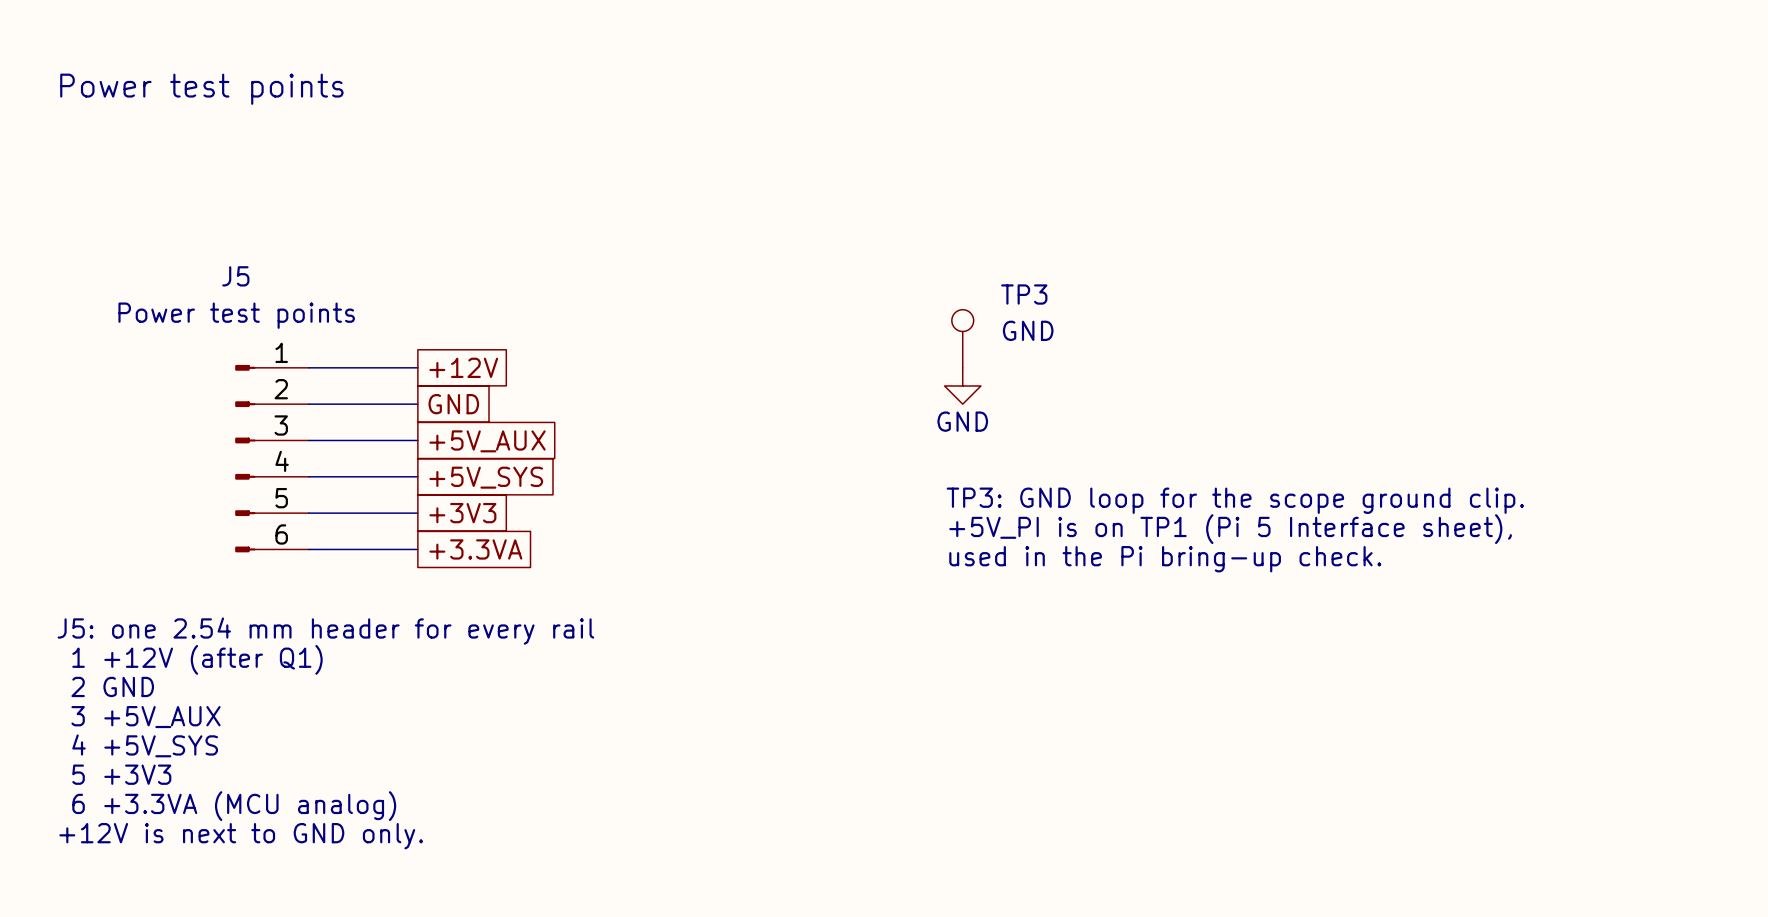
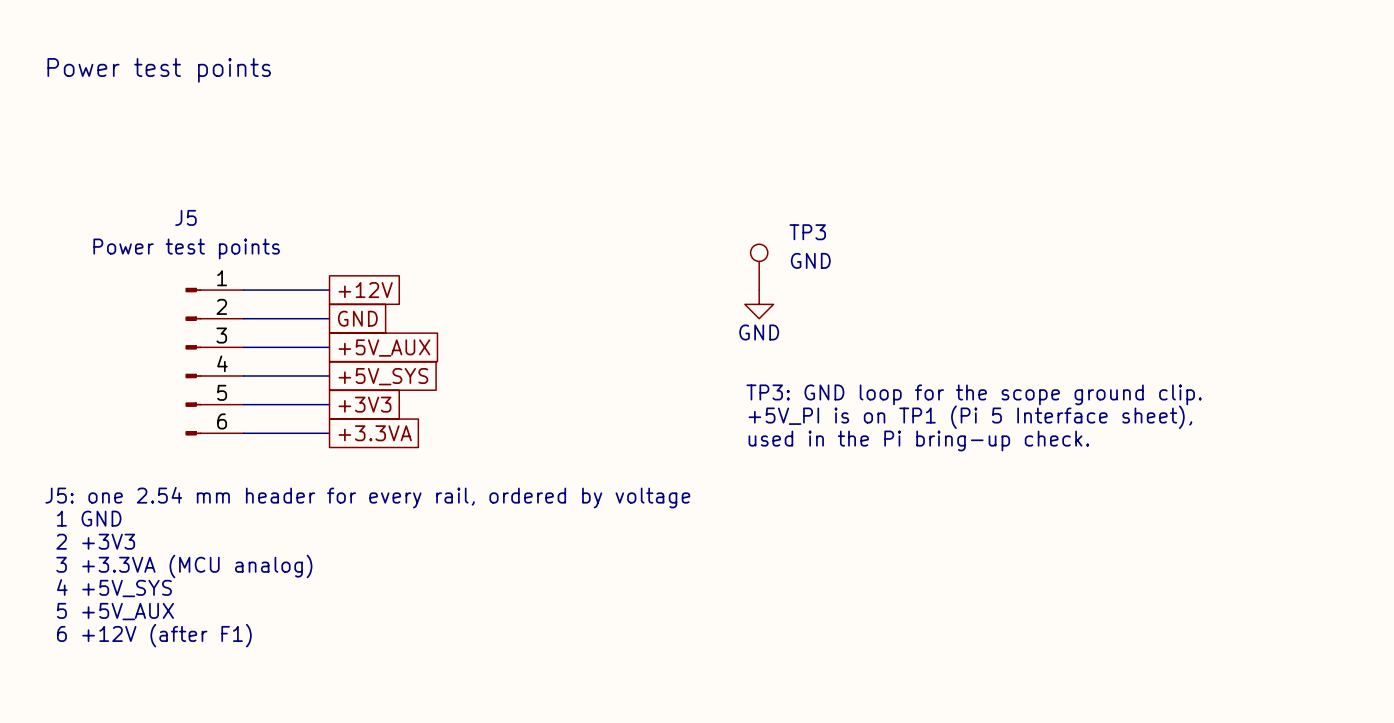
text: J5: one 2.54 mm header for every rail (325, 631) -> J5: one 2.54 mm header for every rail, ordered by voltage (367, 497)
text: 1 +12V (after Q1) (197, 659) -> 1 GND (89, 518)
text: 2 GND (112, 686) -> 2 +3V3 (95, 541)
text: 3 +5V_AUX (146, 717) -> 3 +3.3VA (MCU analog) (184, 566)
text: 5 +3V3 (121, 774) -> 5 +5V_AUX (115, 611)
text: 6 +3.3VA (MCU analog) (234, 806) -> 6 +12V (after F1) (154, 635)
text: +12V is next to GND only. (241, 836) -> none

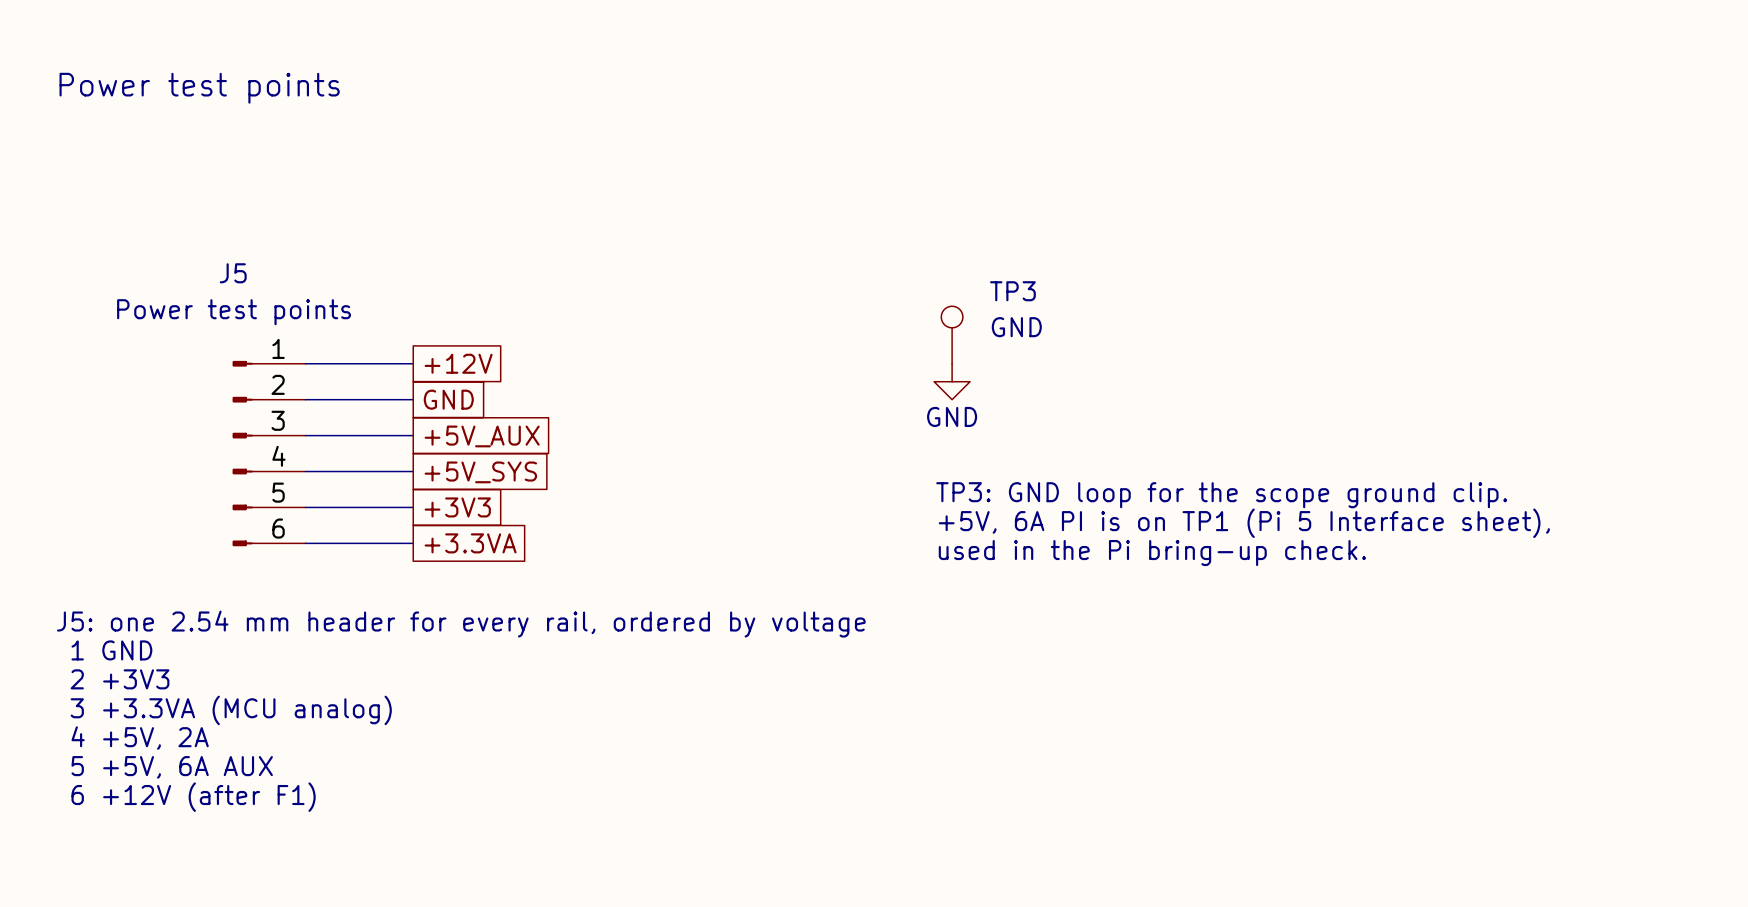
text: +5V_PI is on TP1 (Pi 5 Interface sheet), (970, 417) -> +5V, 6A PI is on TP1 (Pi 5 Interface sheet), (1244, 523)
text: 4 +5V_SYS (114, 588) -> 4 +5V, 2A (140, 738)
text: 5 +5V_AUX (115, 611) -> 5 +5V, 6A AUX (172, 767)

